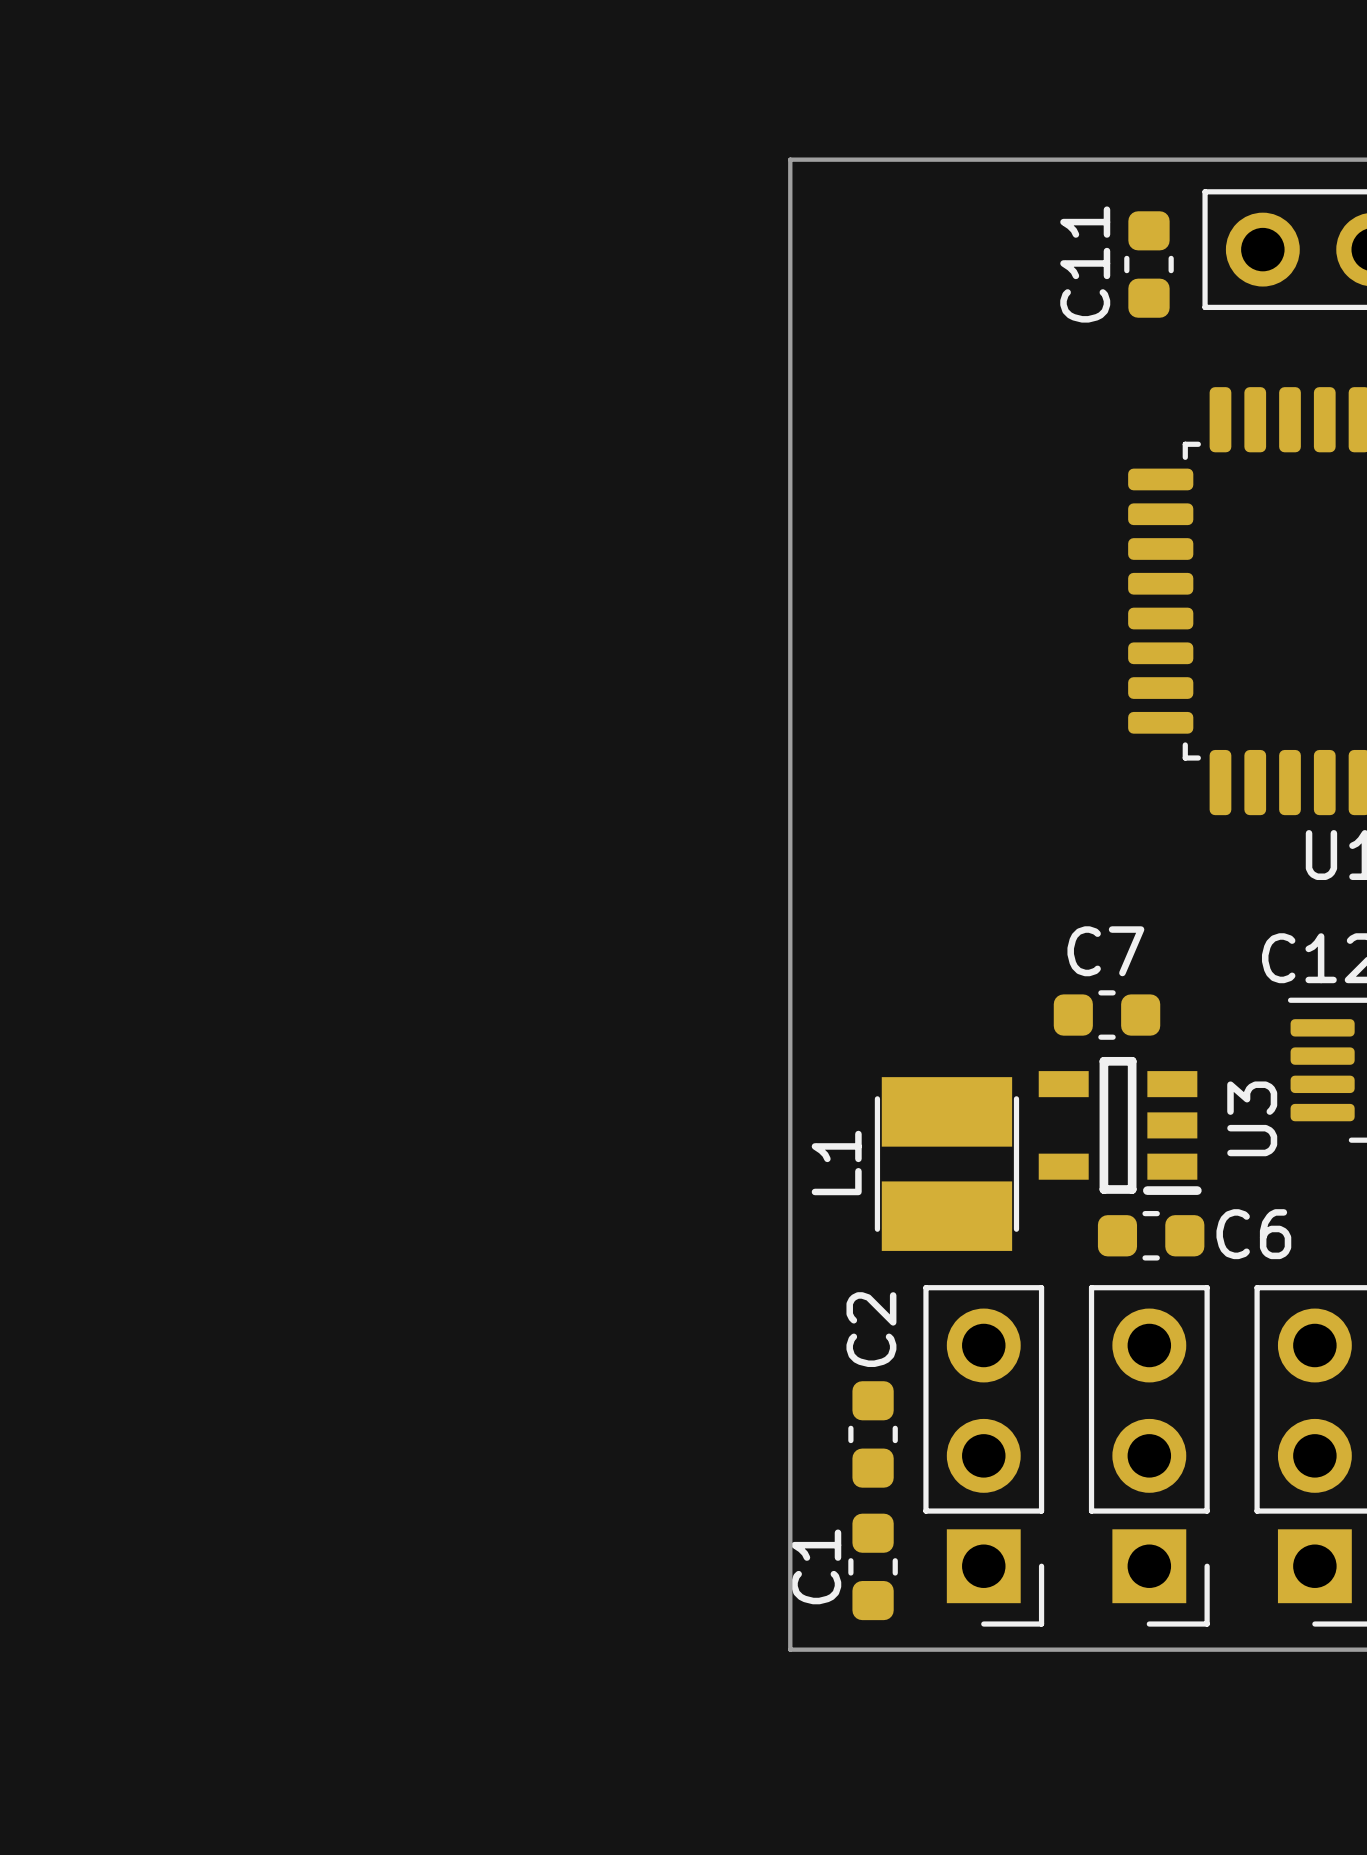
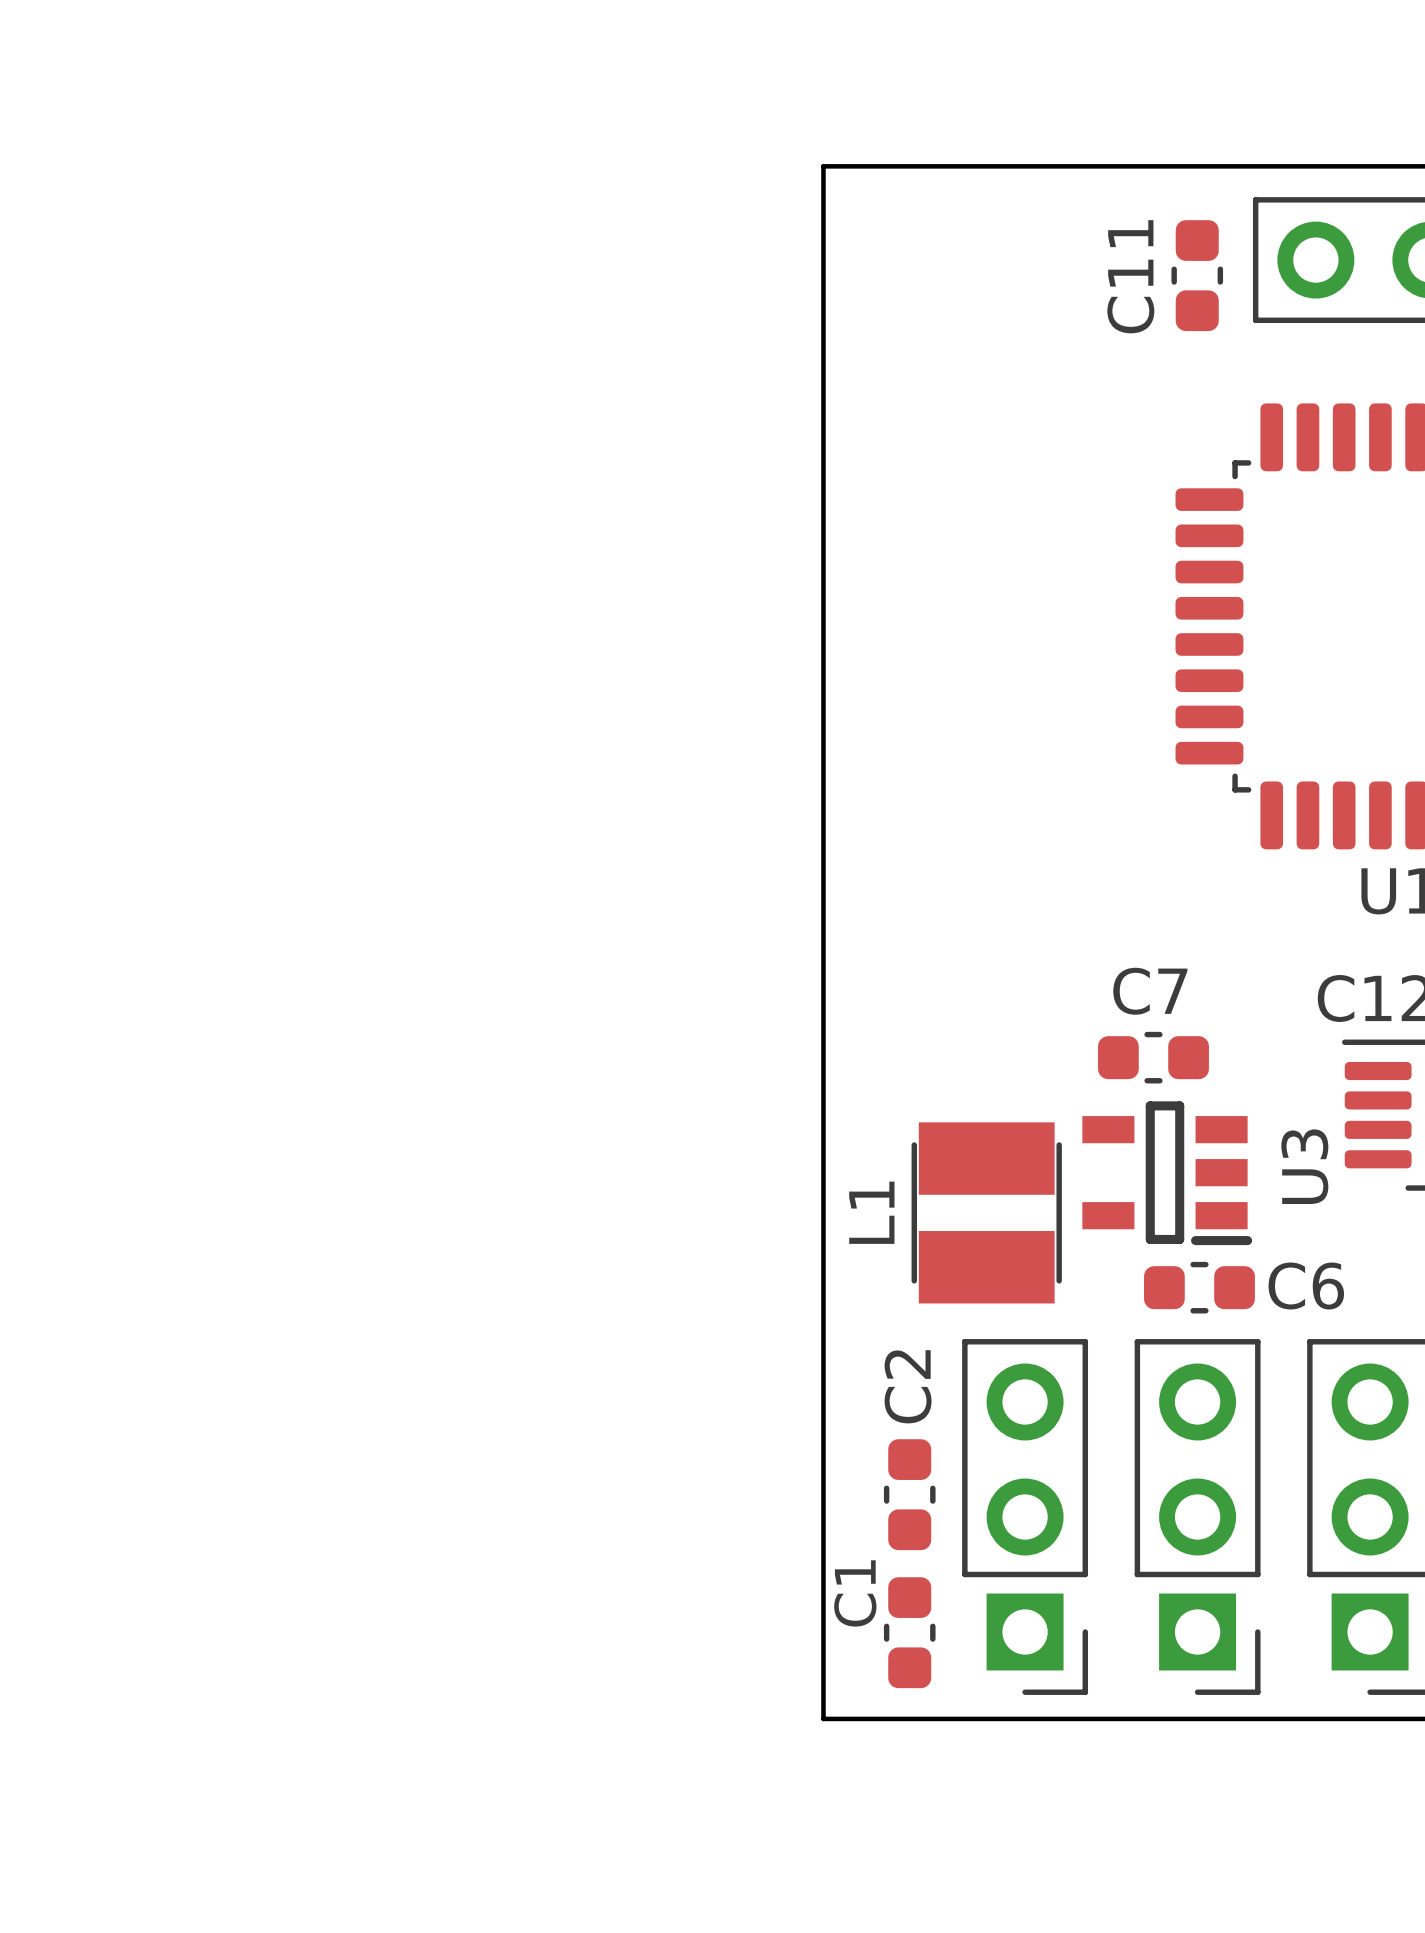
C1 name position: C1 (816, 1566) -> C1 (855, 1593)

